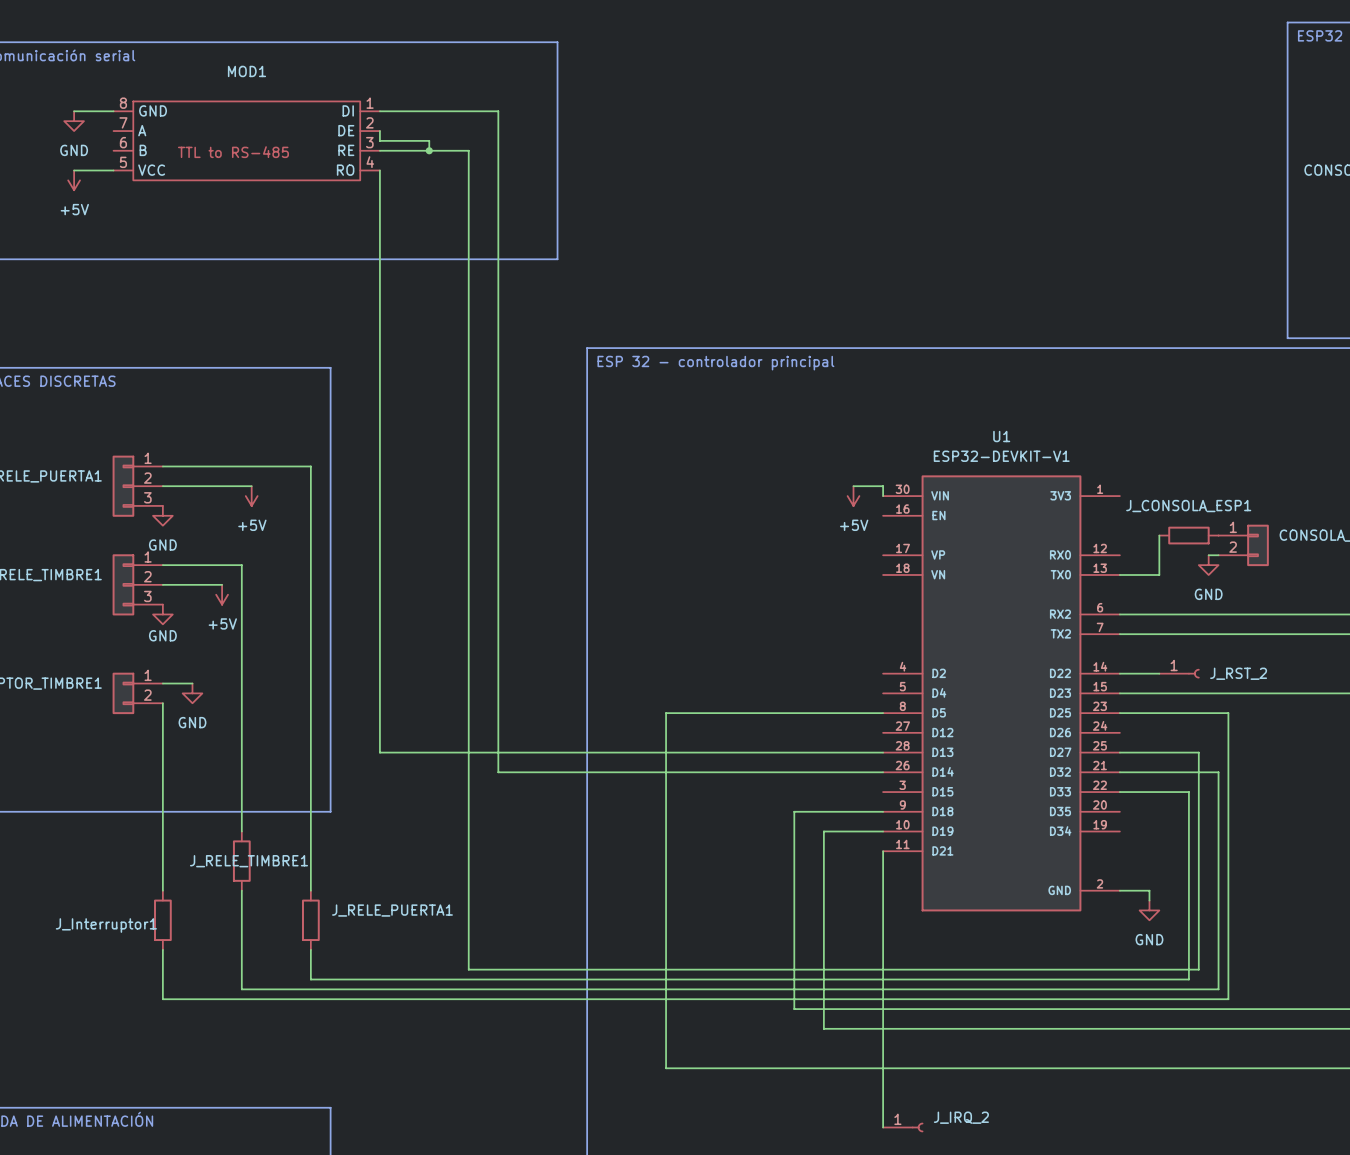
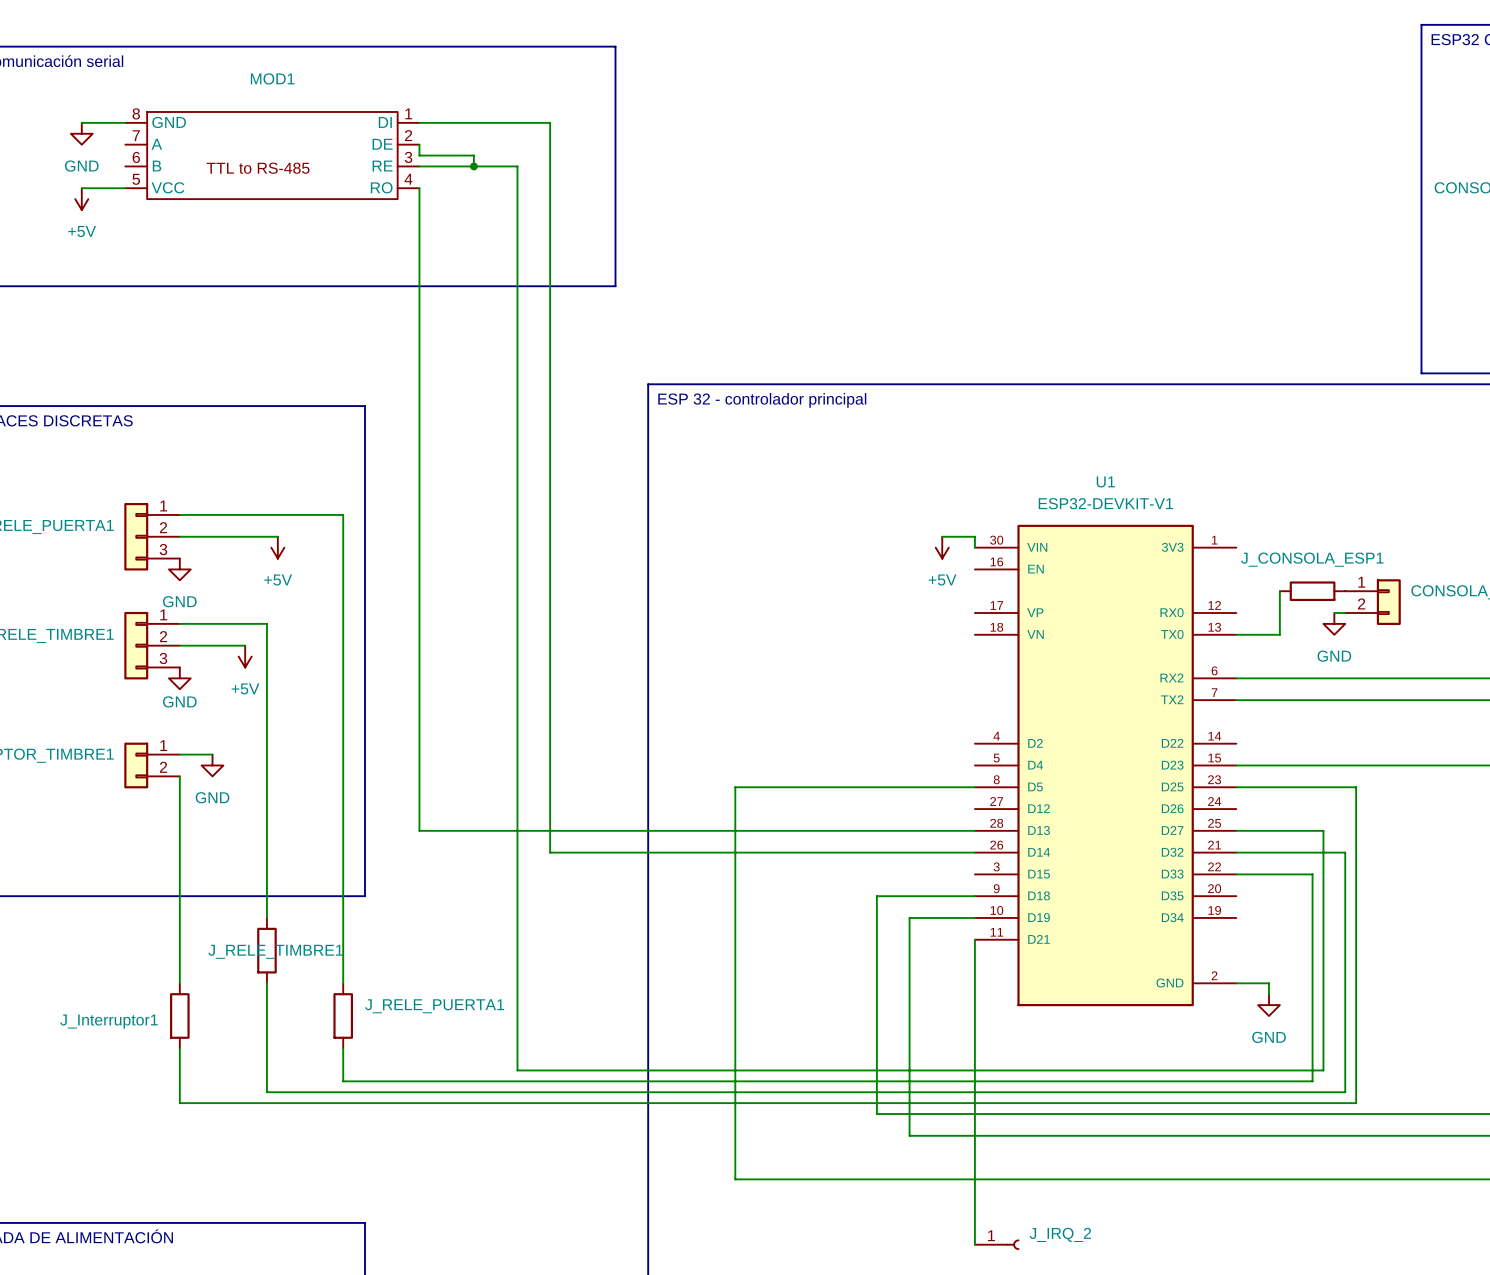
wire: (1119, 673) (1159, 673) -> none
J_RST_2: (1179, 673) -> none

